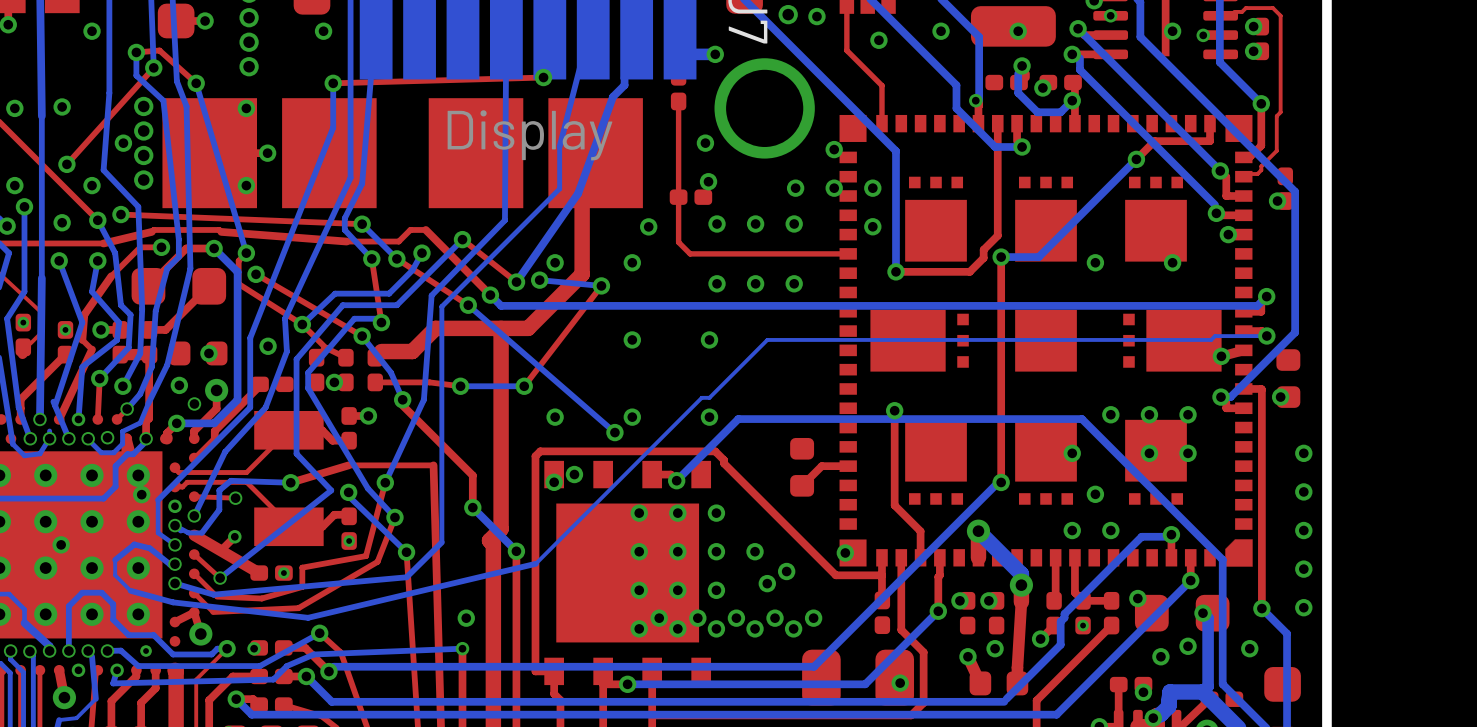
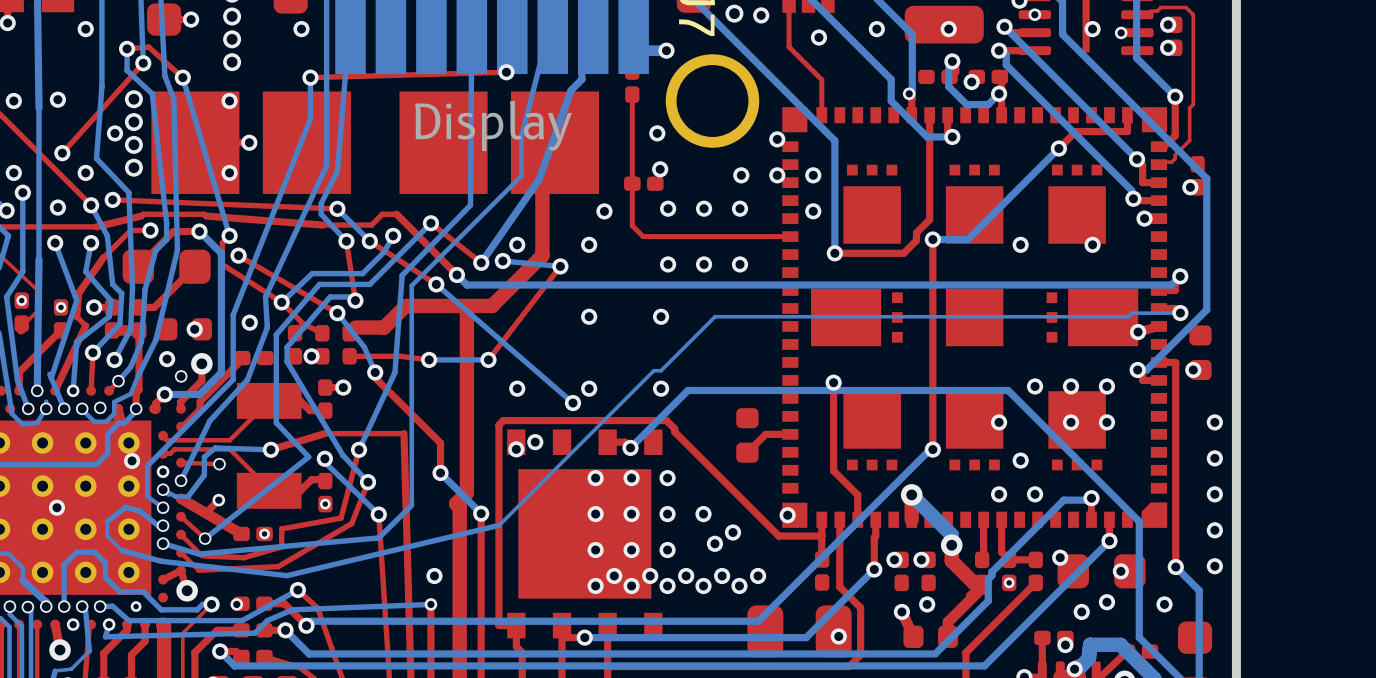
top track: (1021, 601) (1017, 667) -> (951, 560) (973, 582) (982, 582) (982, 587) (948, 622)
bottom track: (1202, 613) (1208, 618) (1208, 686) (1202, 691) -> none
via: (1040, 639) -> none

